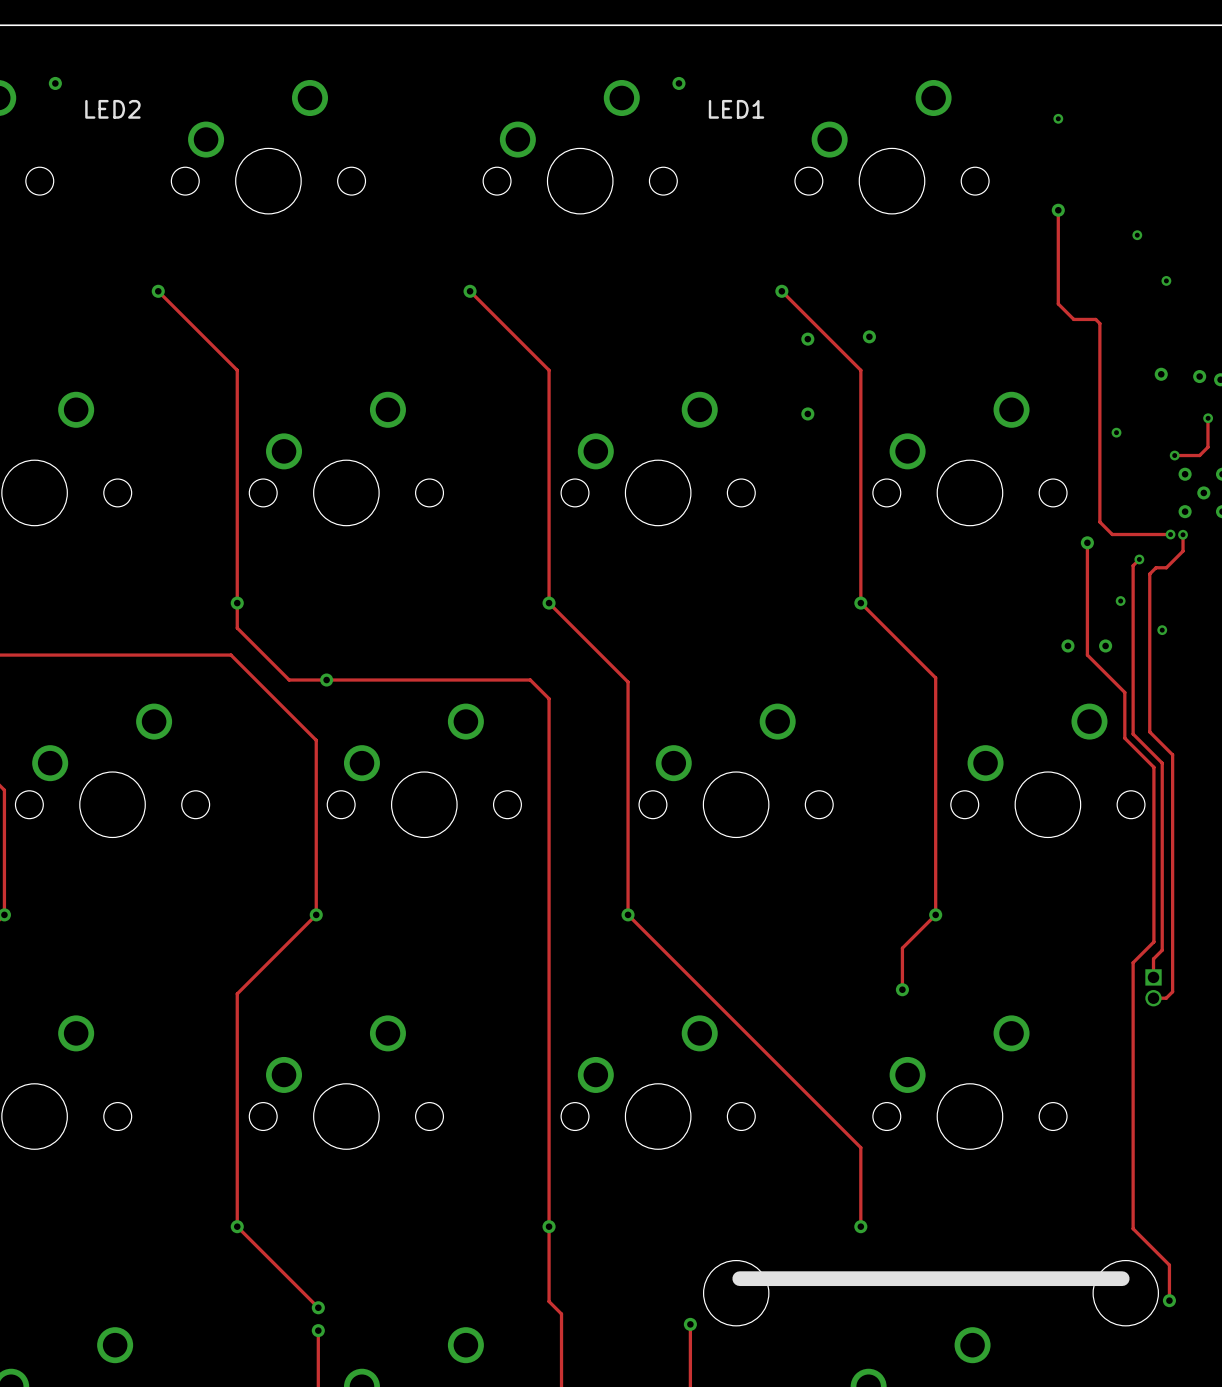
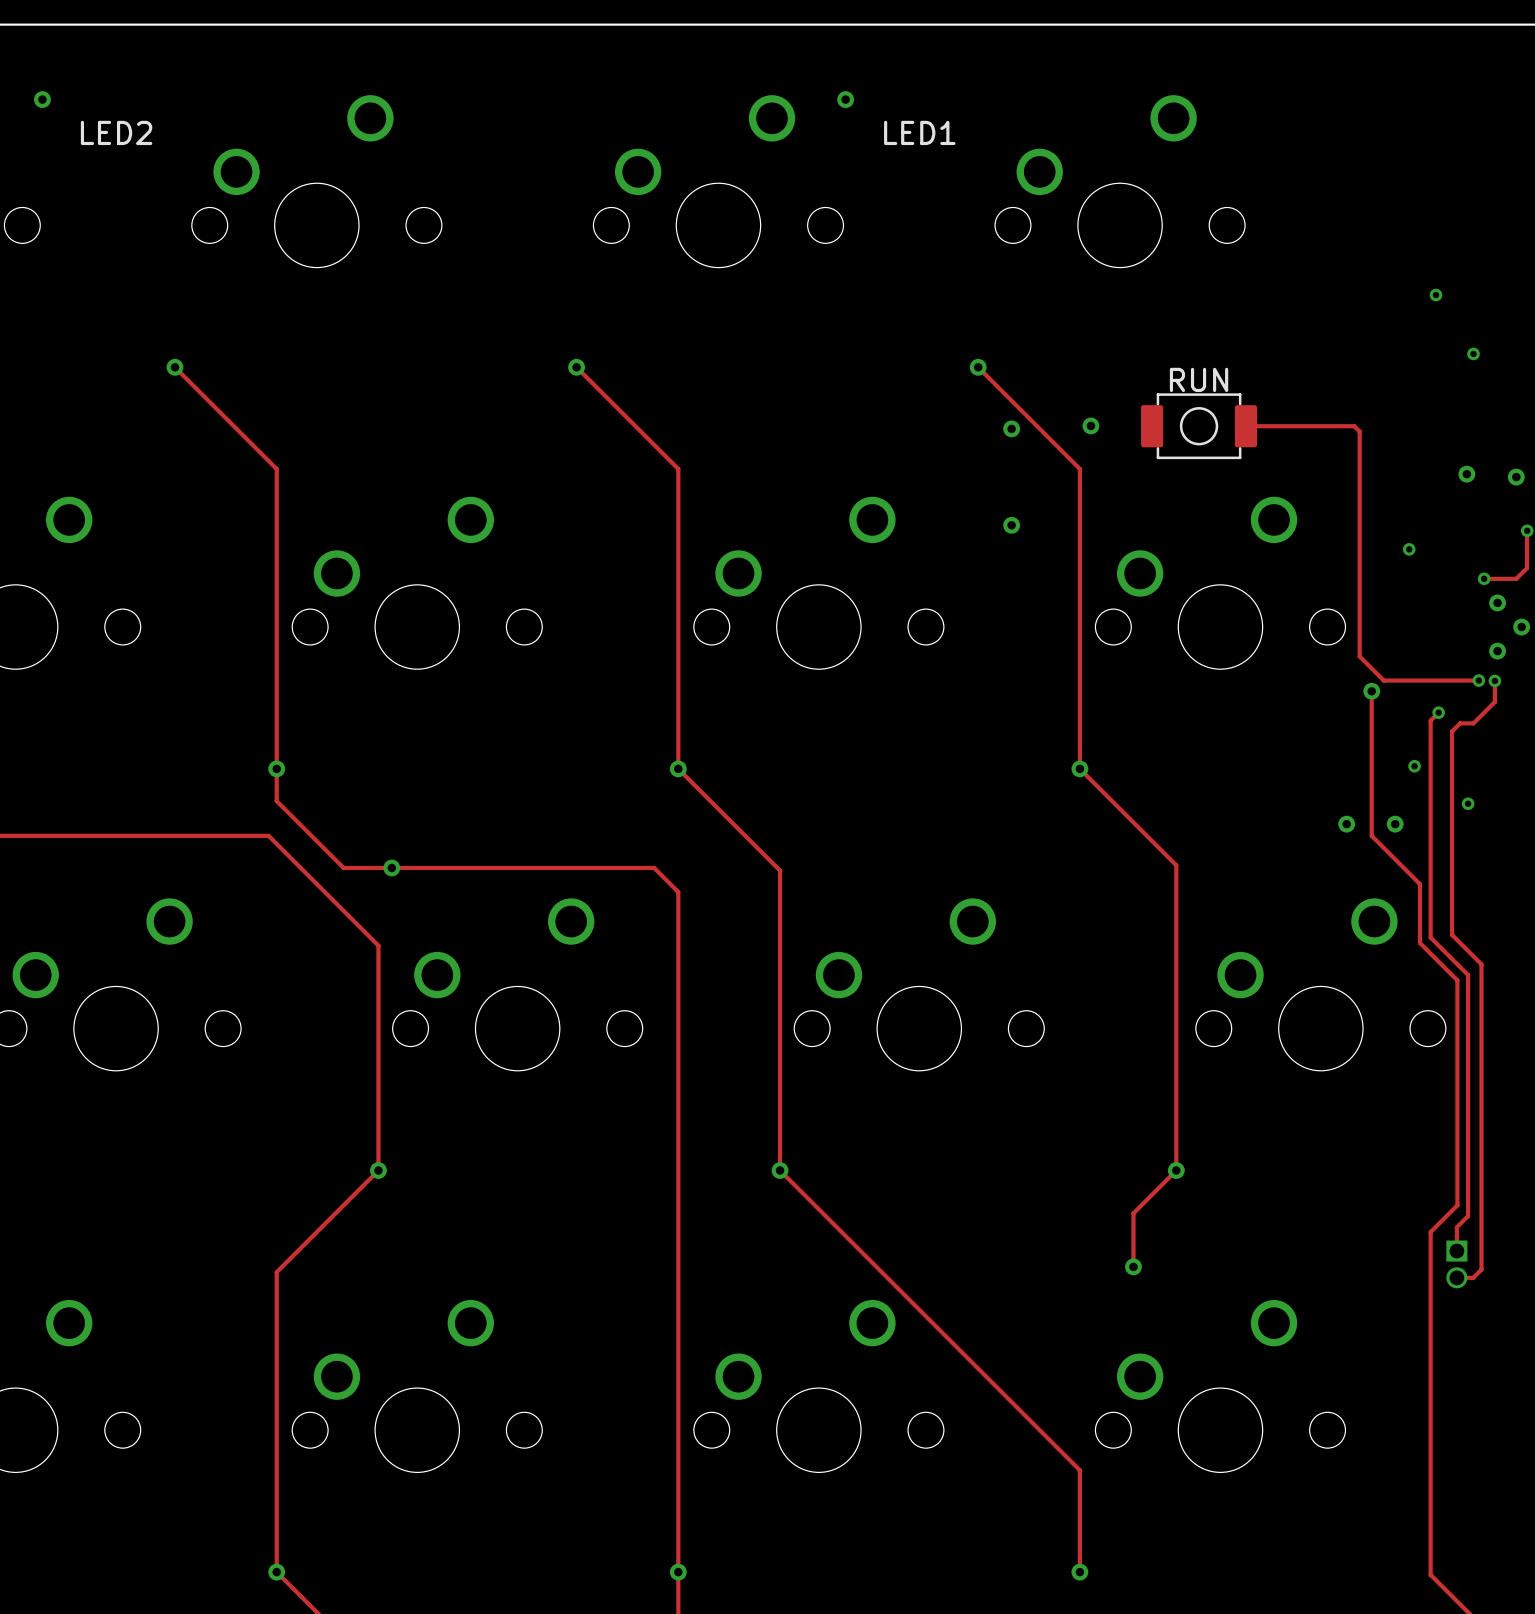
via: (1058, 118) -> none
track: (1058, 210) (1058, 303) (1073, 319) (1095, 319) (1099, 323) (1099, 522) (1112, 534) -> (1245, 426) (1354, 426) (1359, 431) (1359, 656) (1383, 680) (1403, 680)
via: (1058, 210) -> none
part: none -> (1199, 426)

